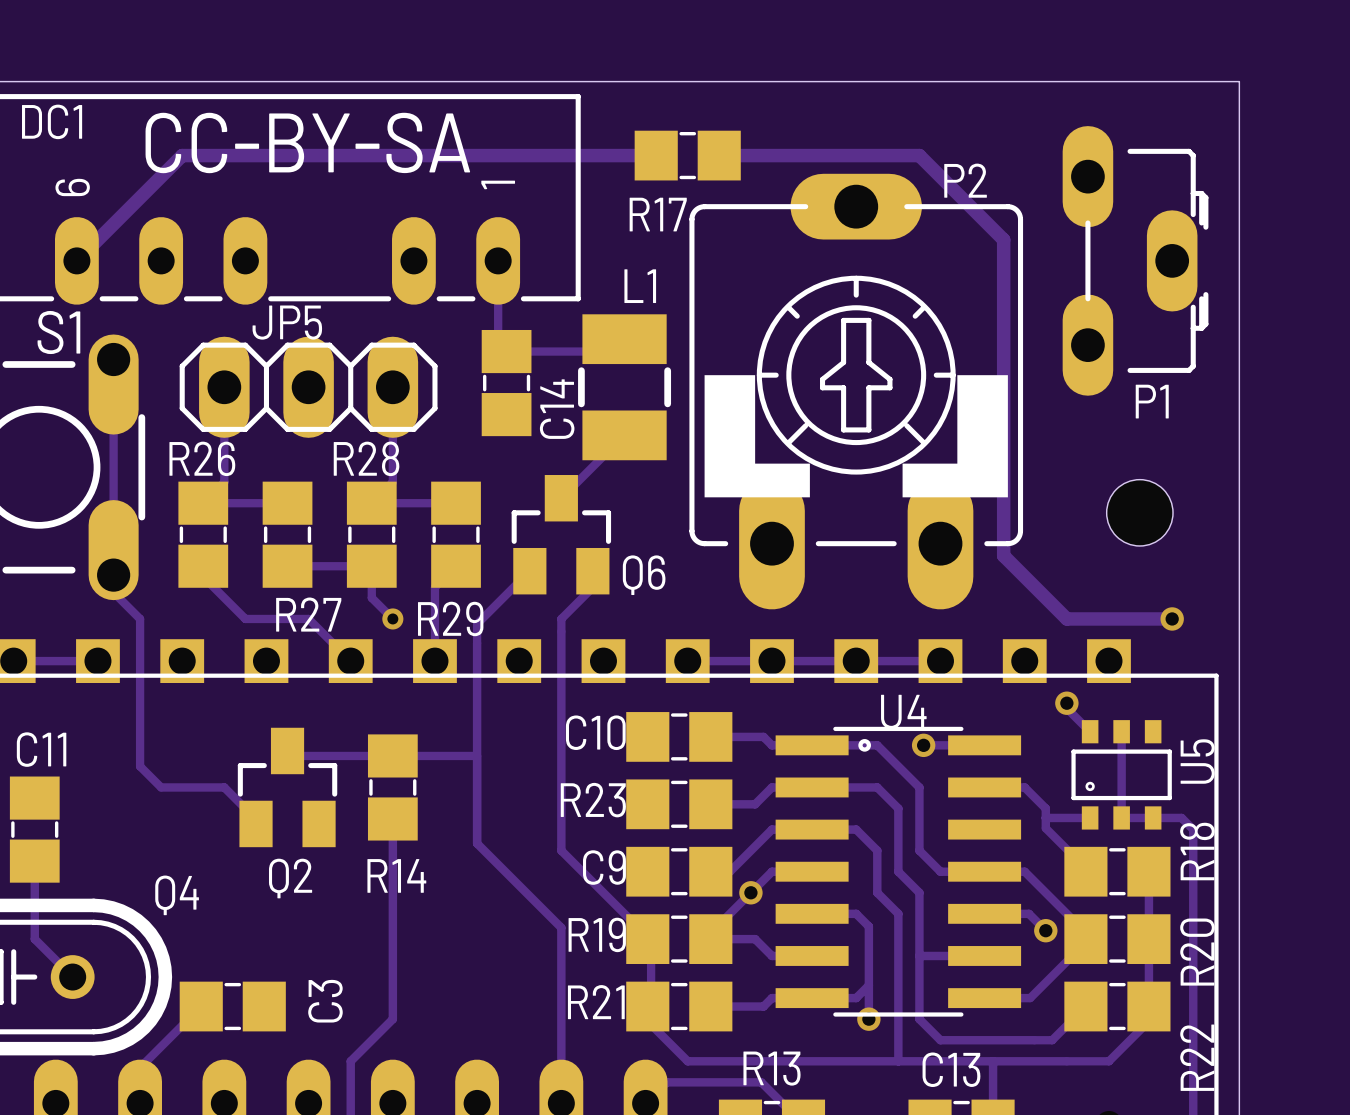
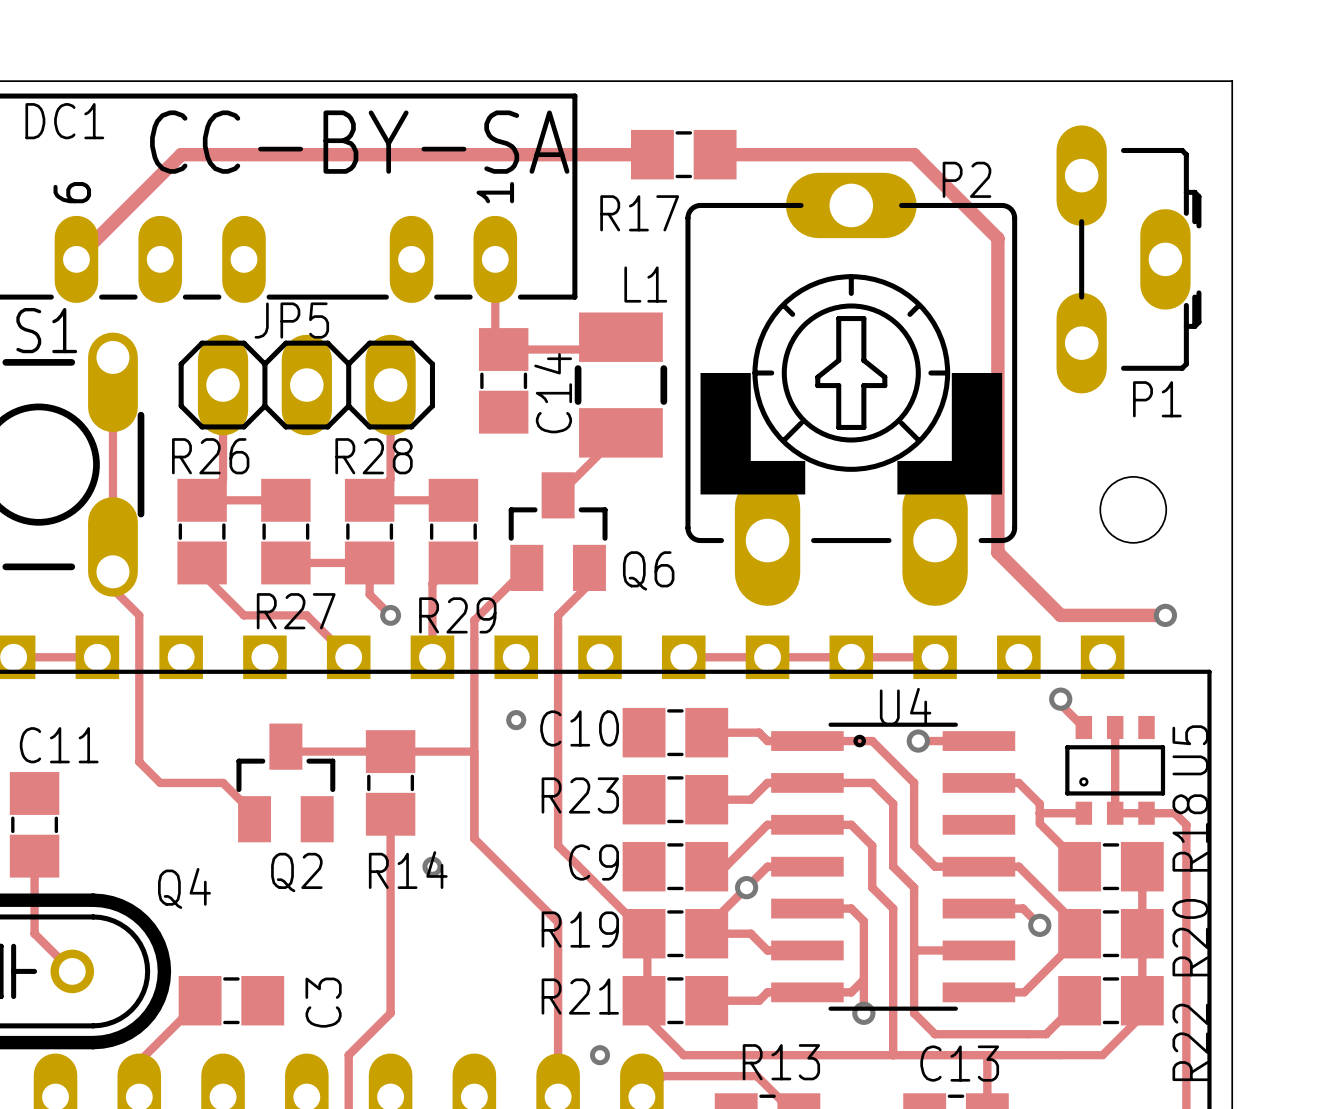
via: none -> (516, 720)
via: none -> (432, 866)
via: none -> (600, 1055)

